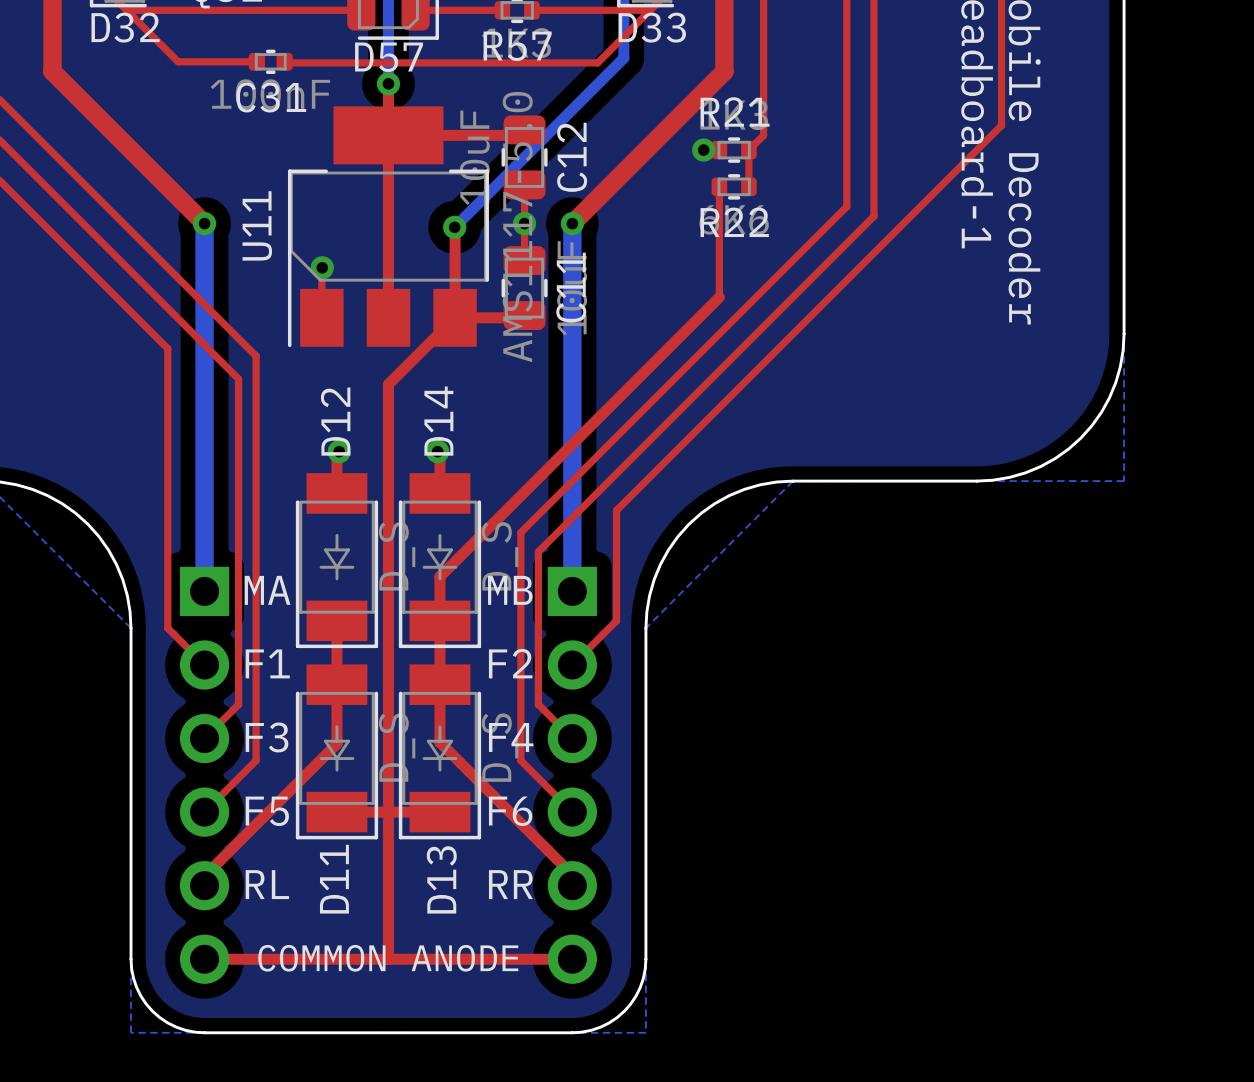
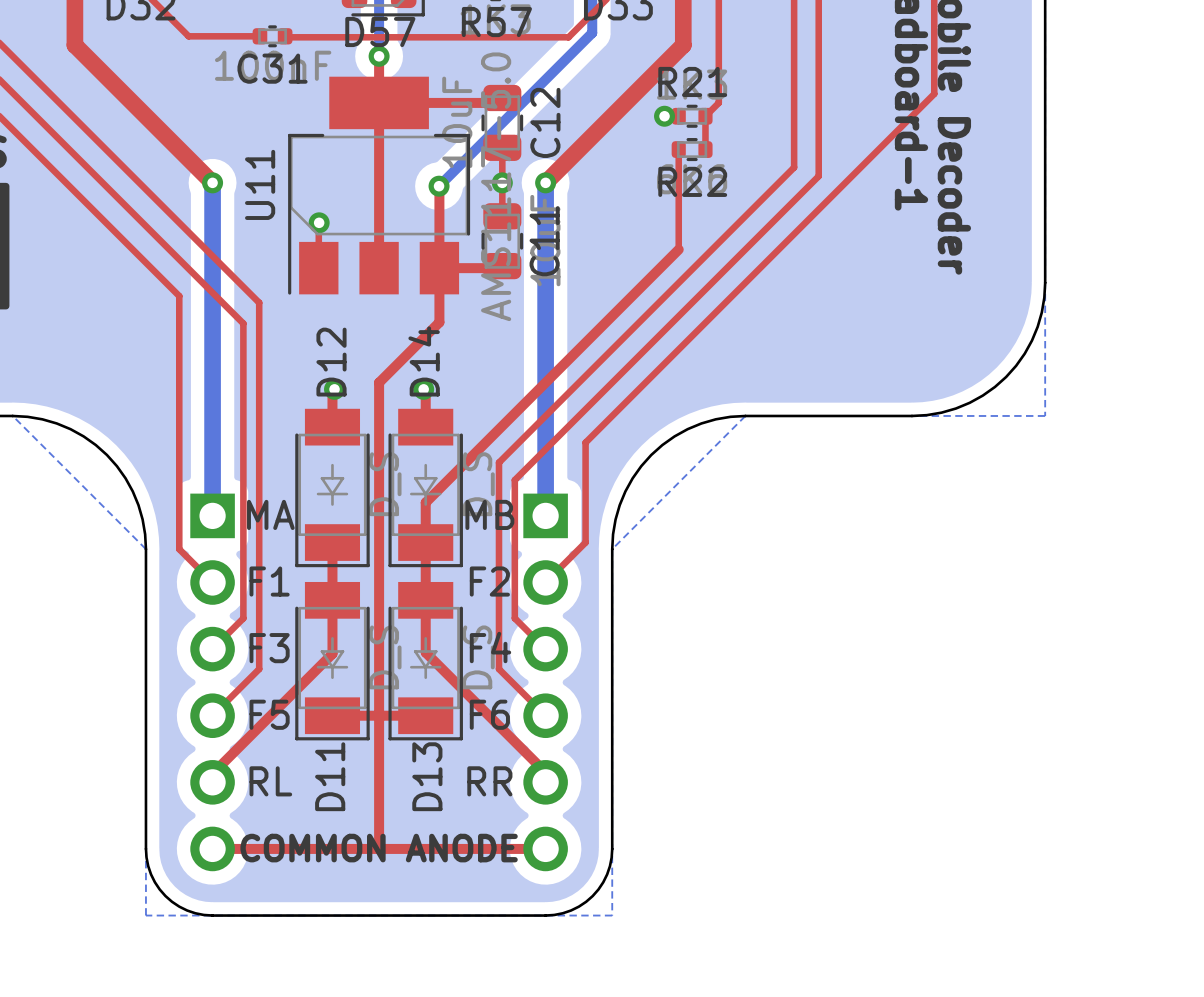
top track: (455, 317) (388, 384) (388, 444) -> (439, 268) (439, 322) (379, 382)

